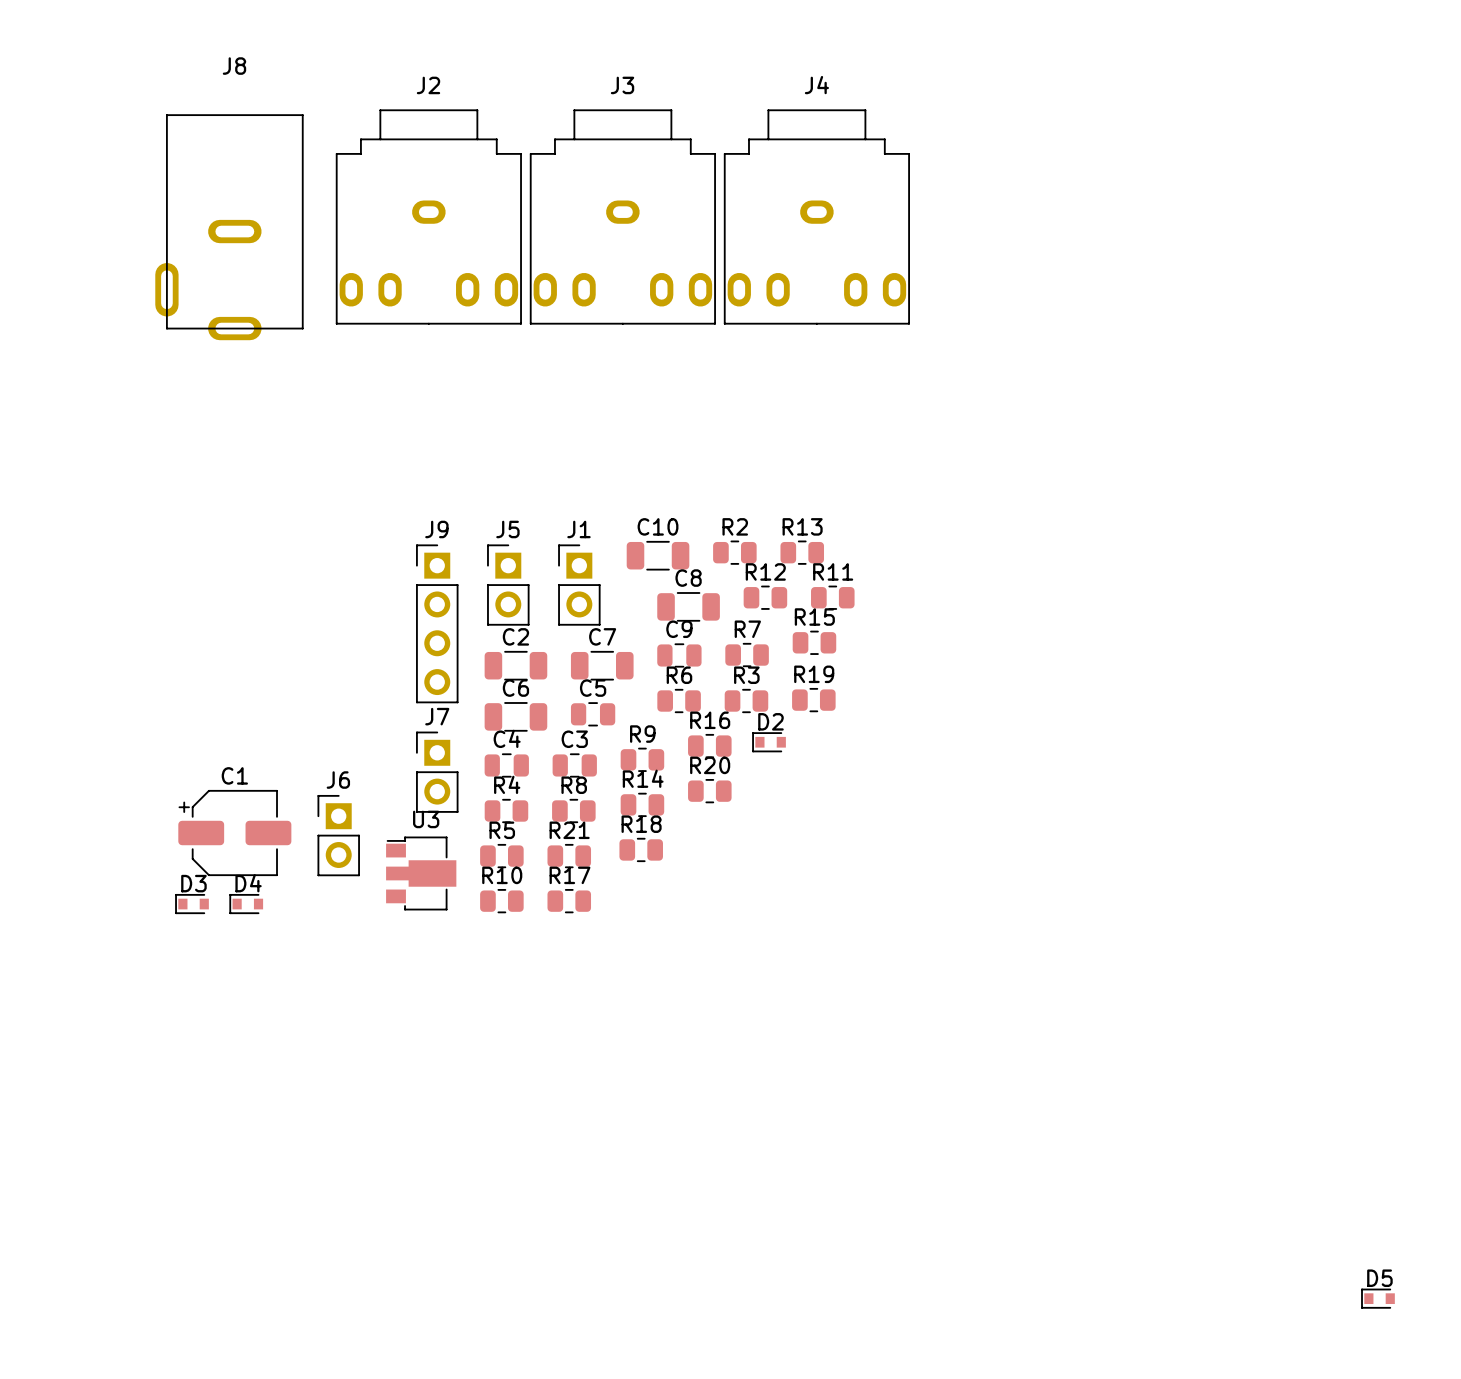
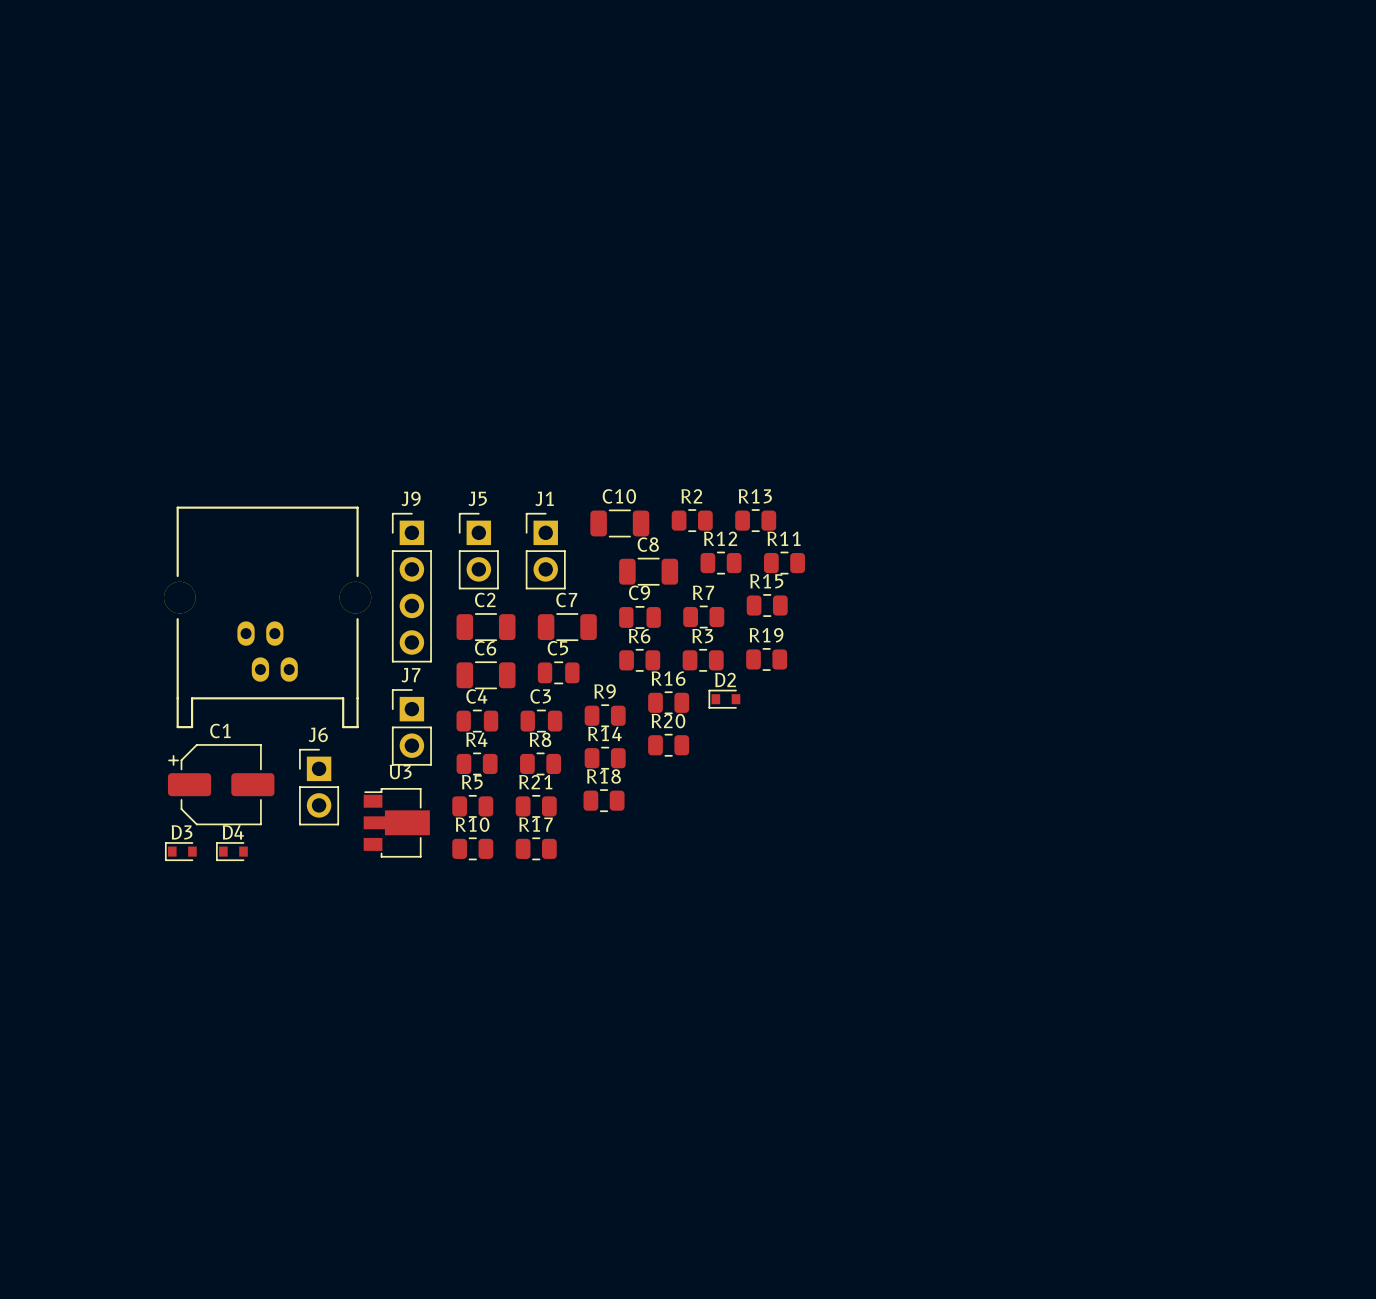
J2: (428, 216) -> none
J3: (622, 216) -> none
J4: (816, 216) -> none
J8: (229, 227) -> none
part: none -> (267, 617)
D5: (1377, 1298) -> none

